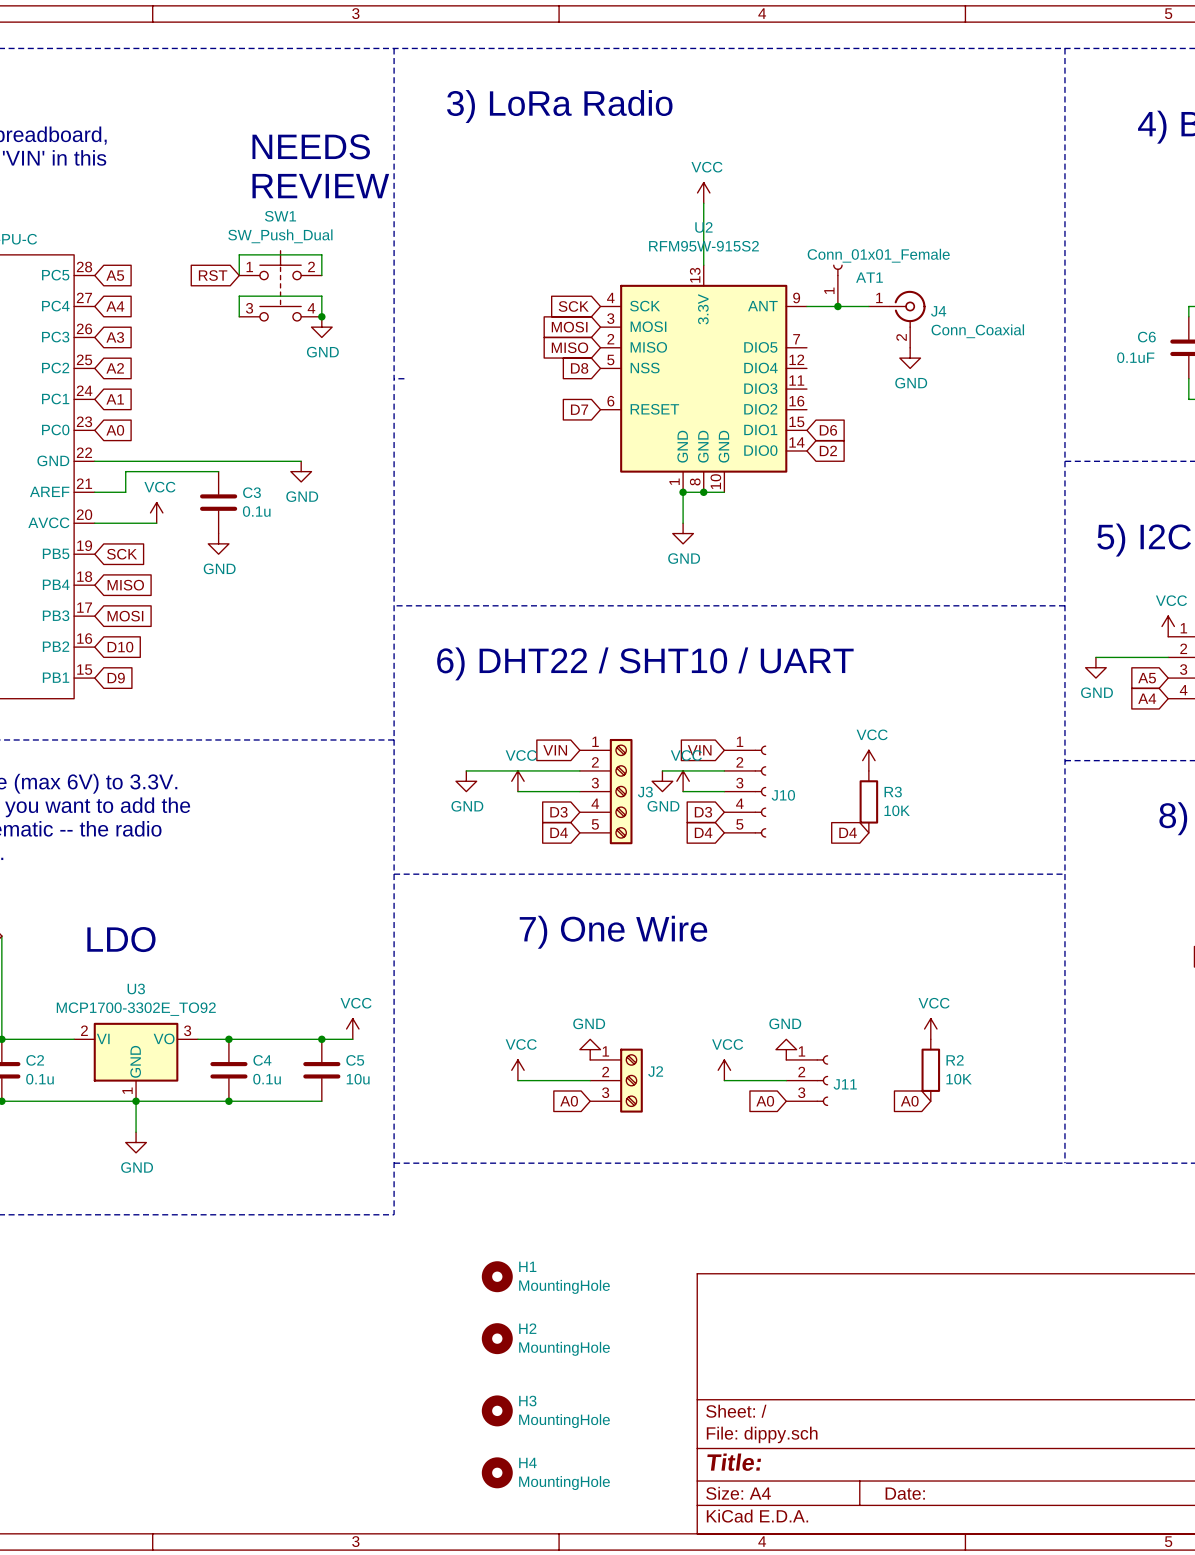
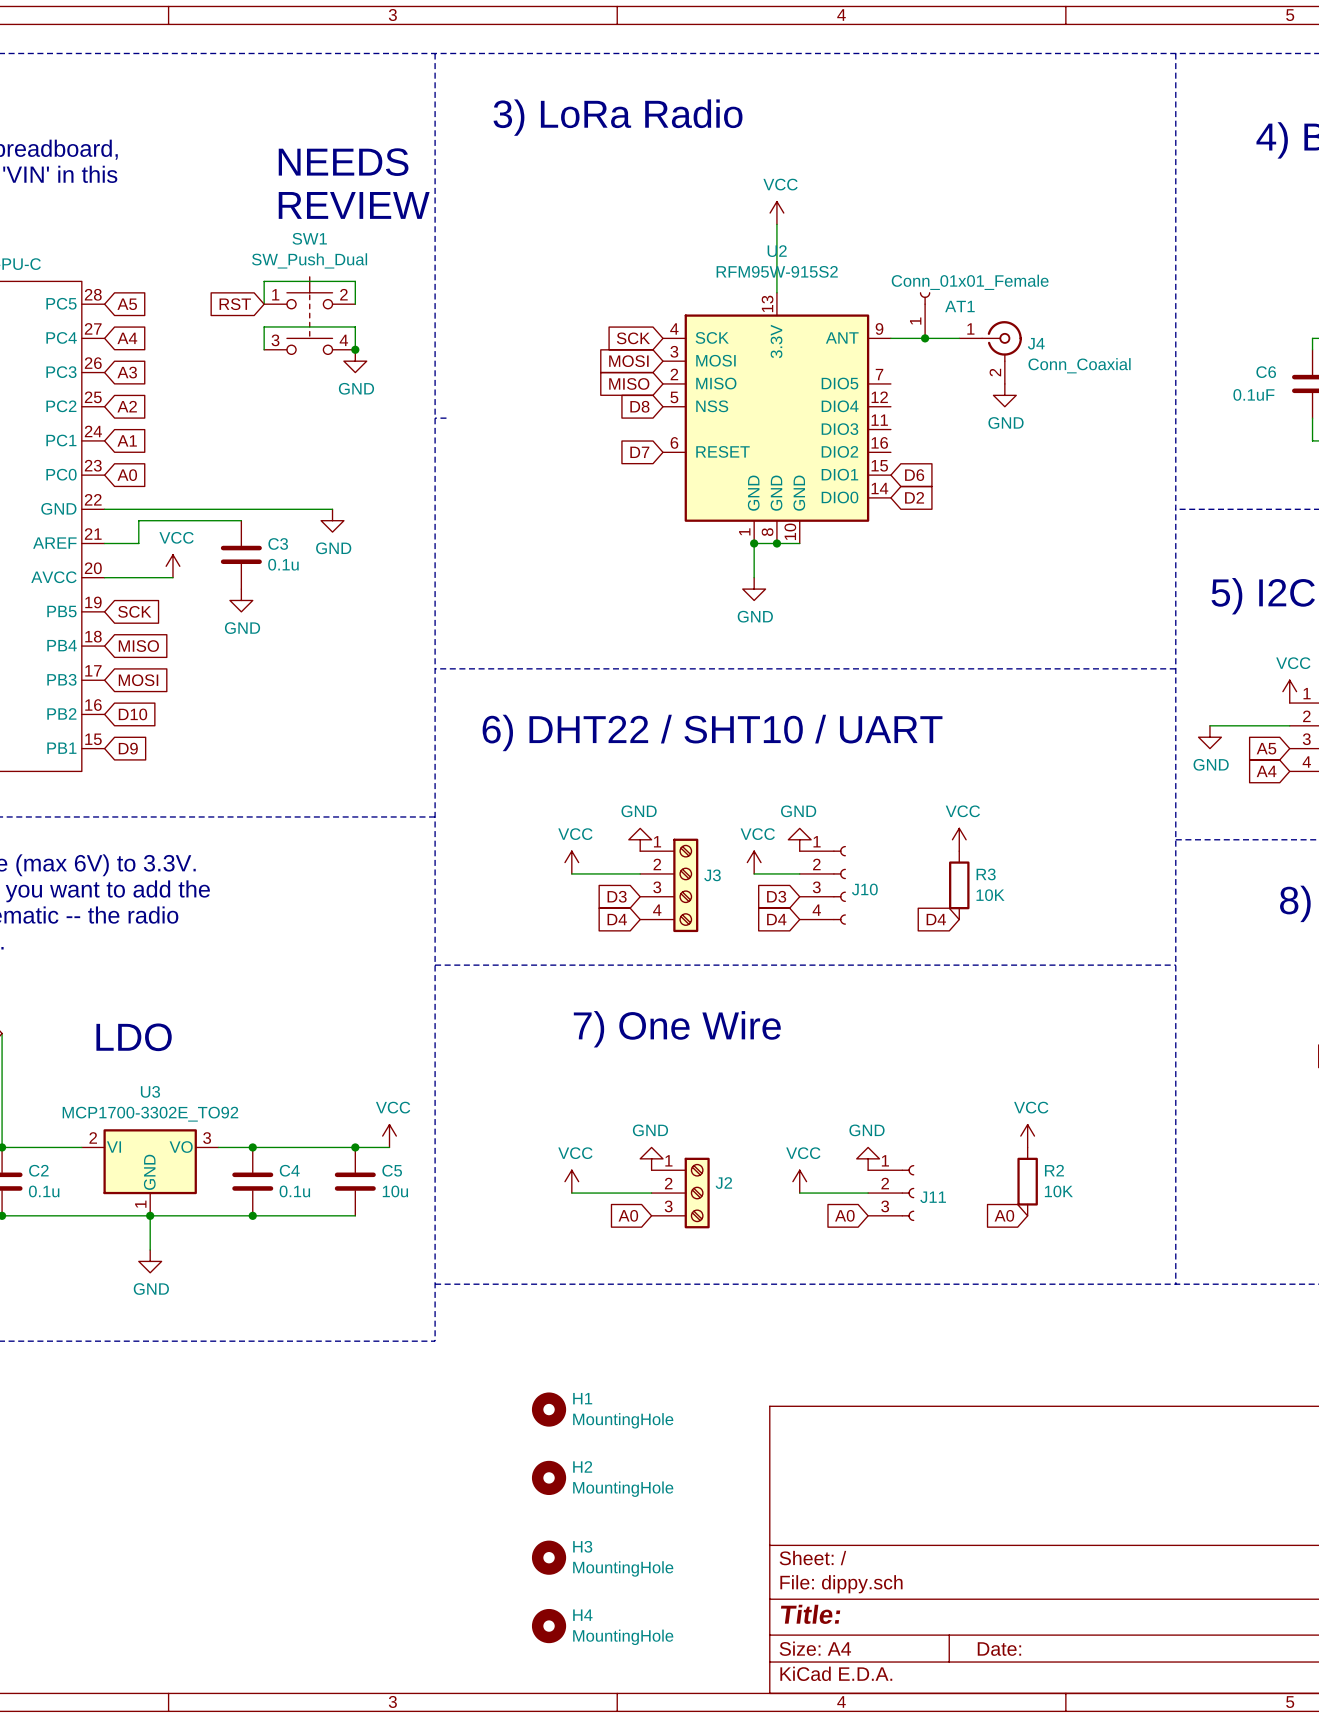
J3 symbol: [579, 738, 633, 845] -> [640, 838, 699, 933]
J10 symbol: [724, 745, 767, 838] -> [799, 845, 846, 925]
global label: VIN (555, 750) -> none
global label: VIN (699, 750) -> none
power symbol: none -> GND (640, 839)
power symbol: none -> GND (799, 839)
wire: (466, 770) (579, 770) -> none
wire: (662, 770) (724, 770) -> none
power symbol: GND (466, 781) -> none
power symbol: GND (662, 781) -> none

